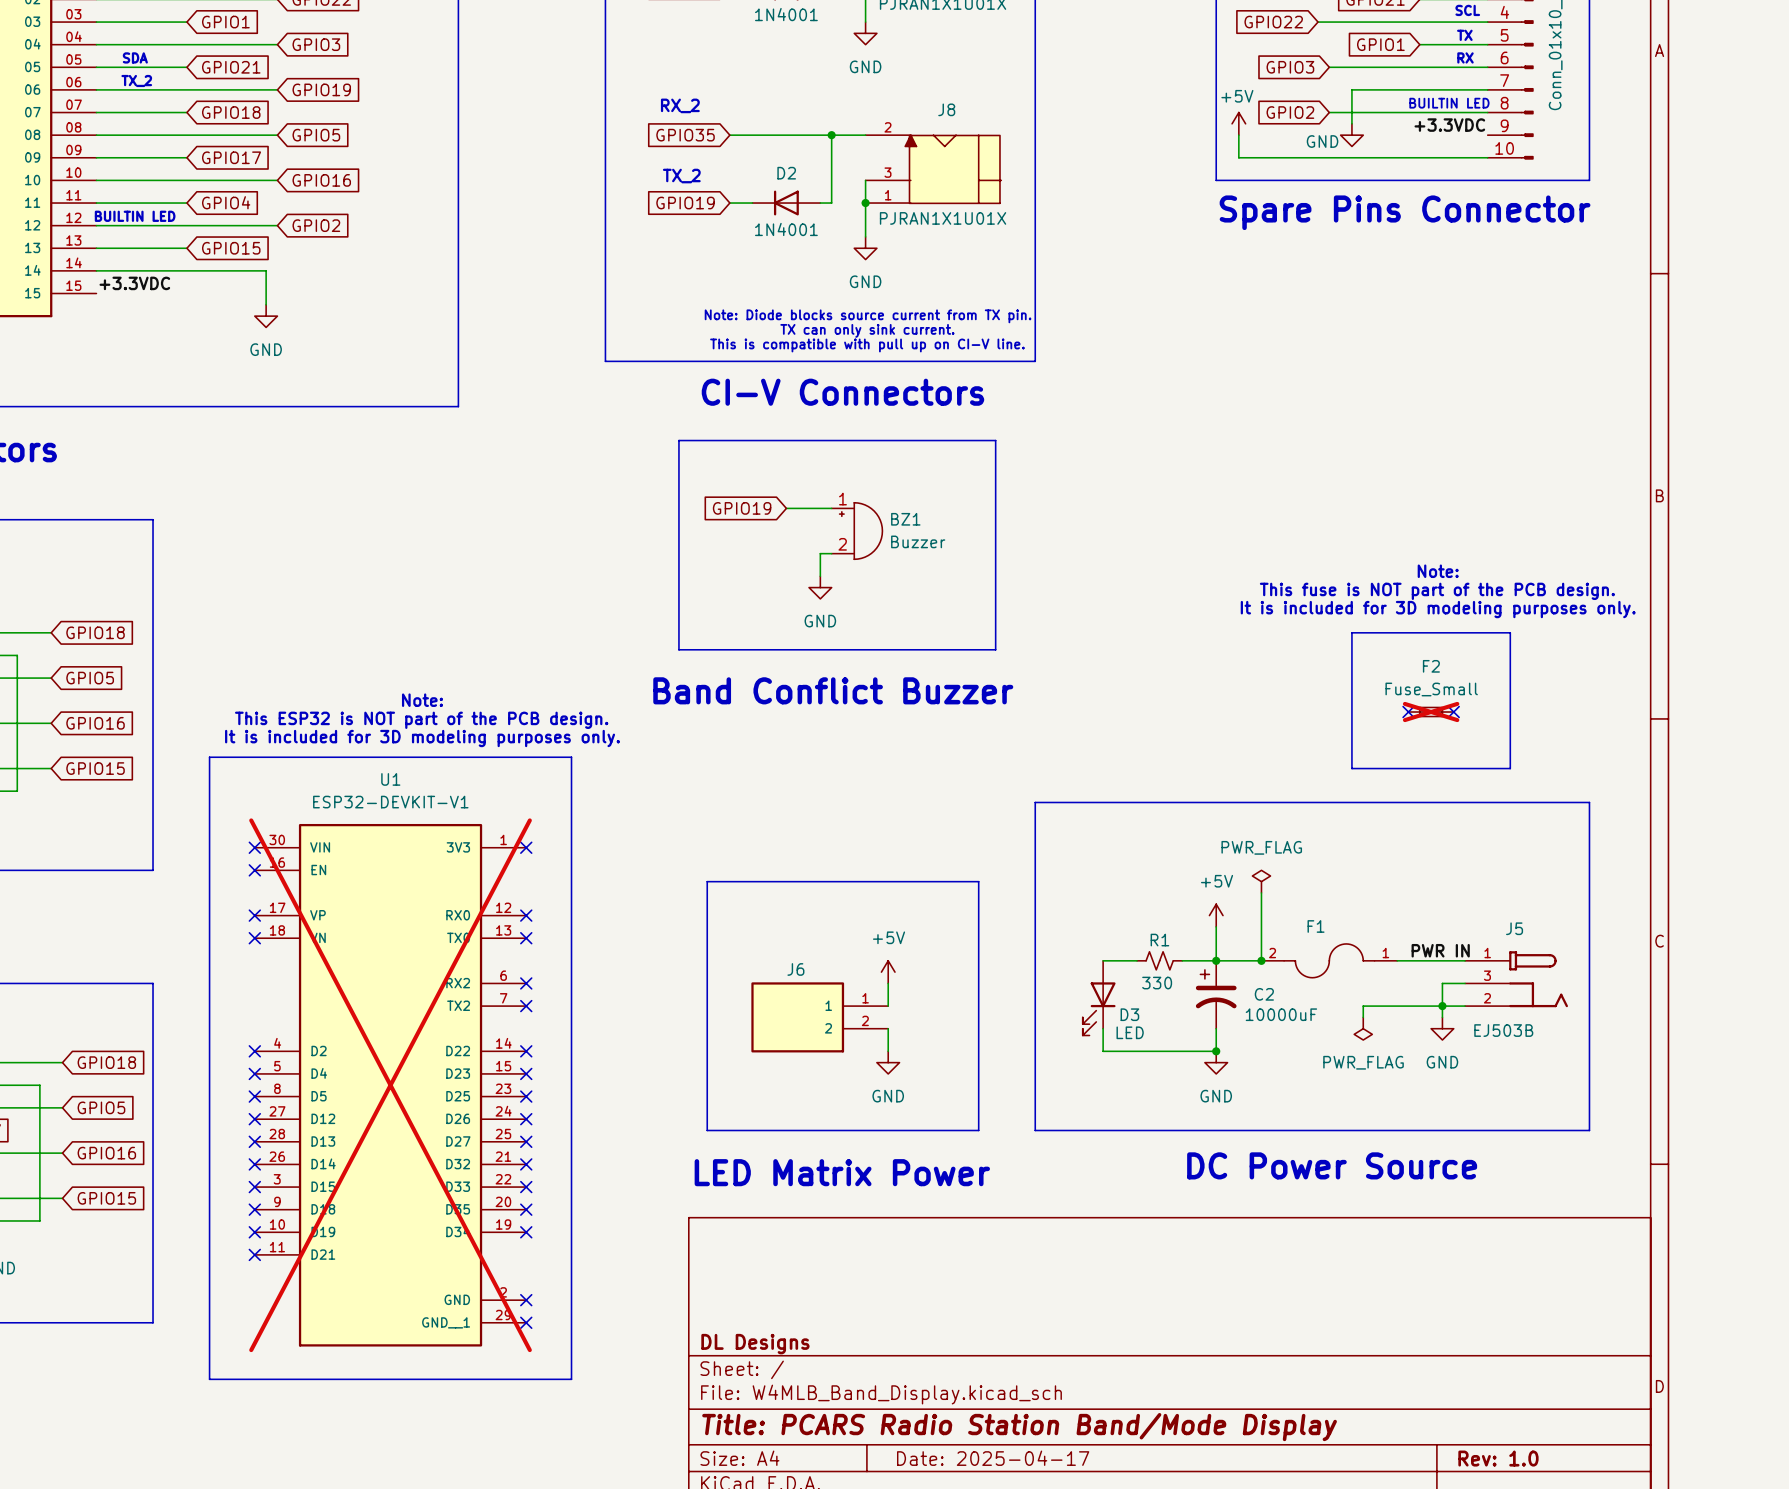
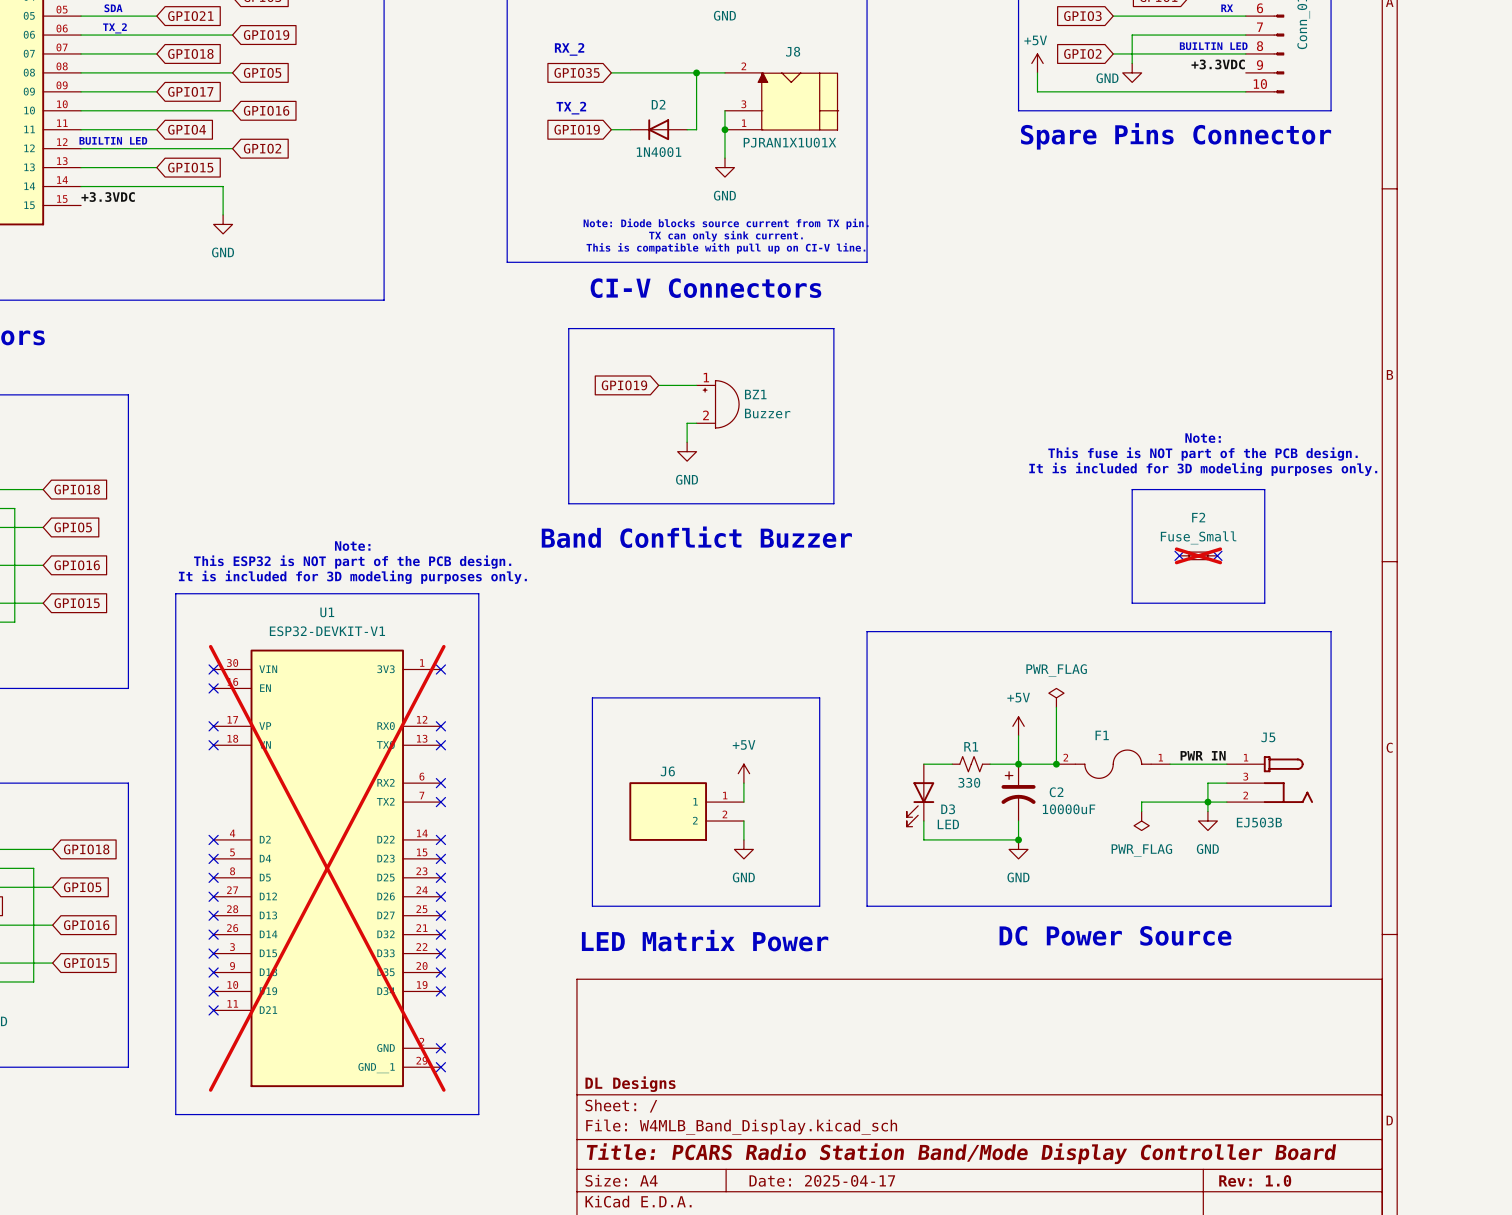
title block: Title: PCARS Radio Station Band/Mode Display (1019, 1427) -> Title: PCARS Radio Station Band/Mode Display Controller Board (961, 1153)

